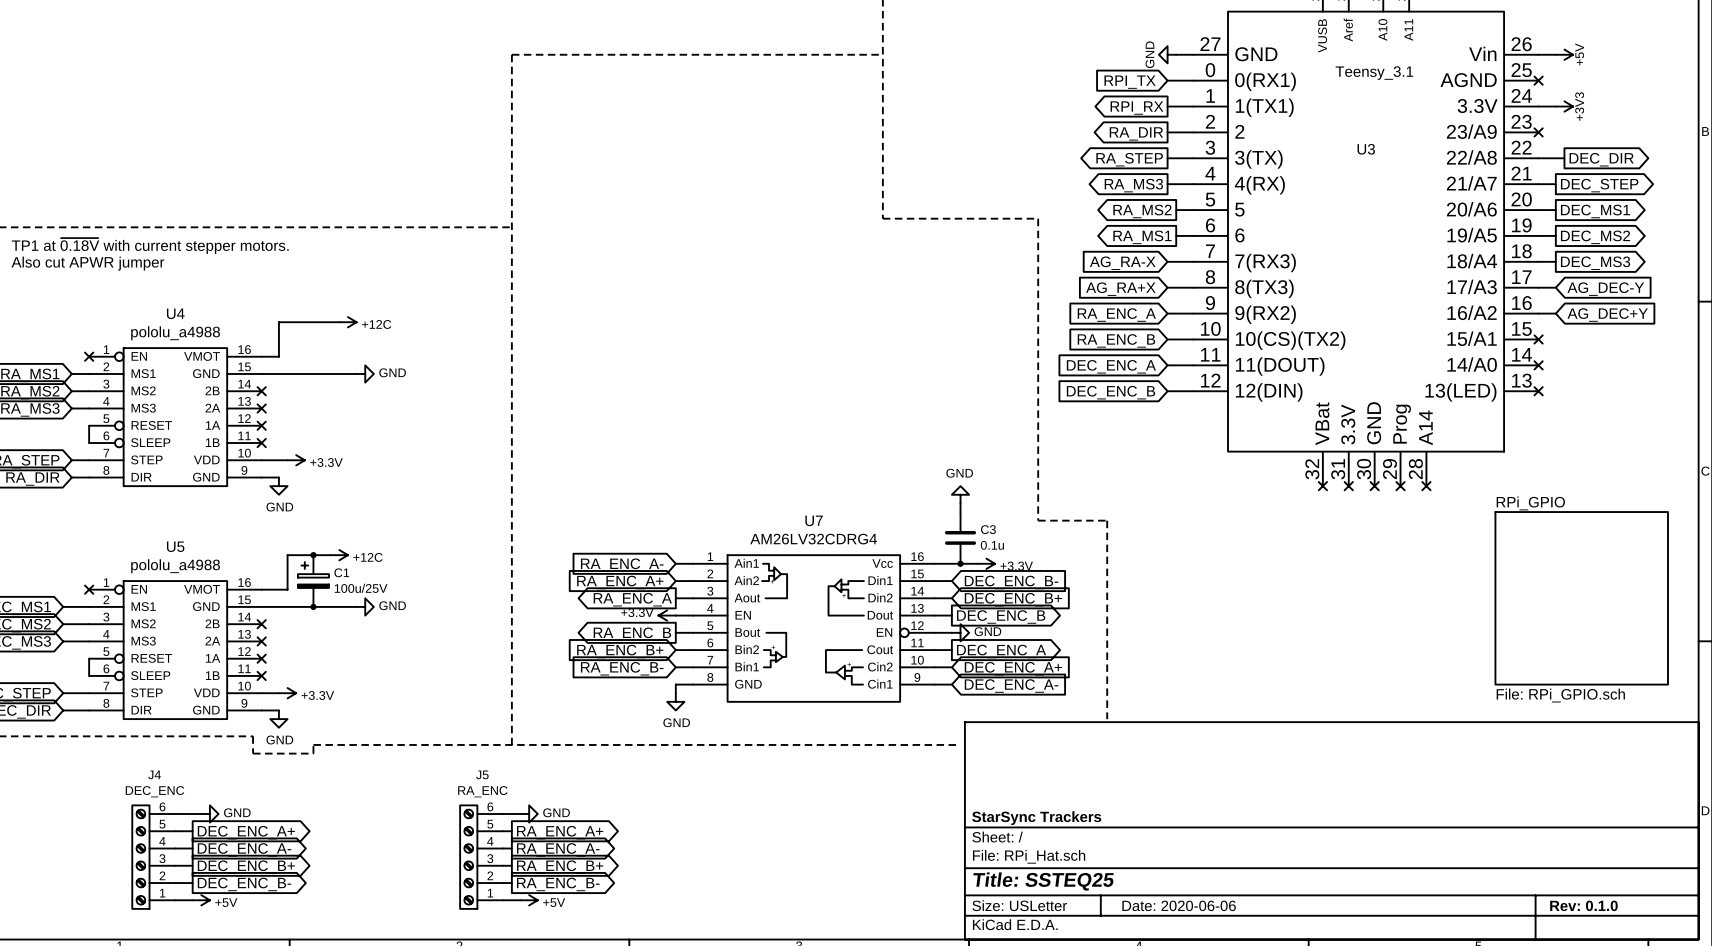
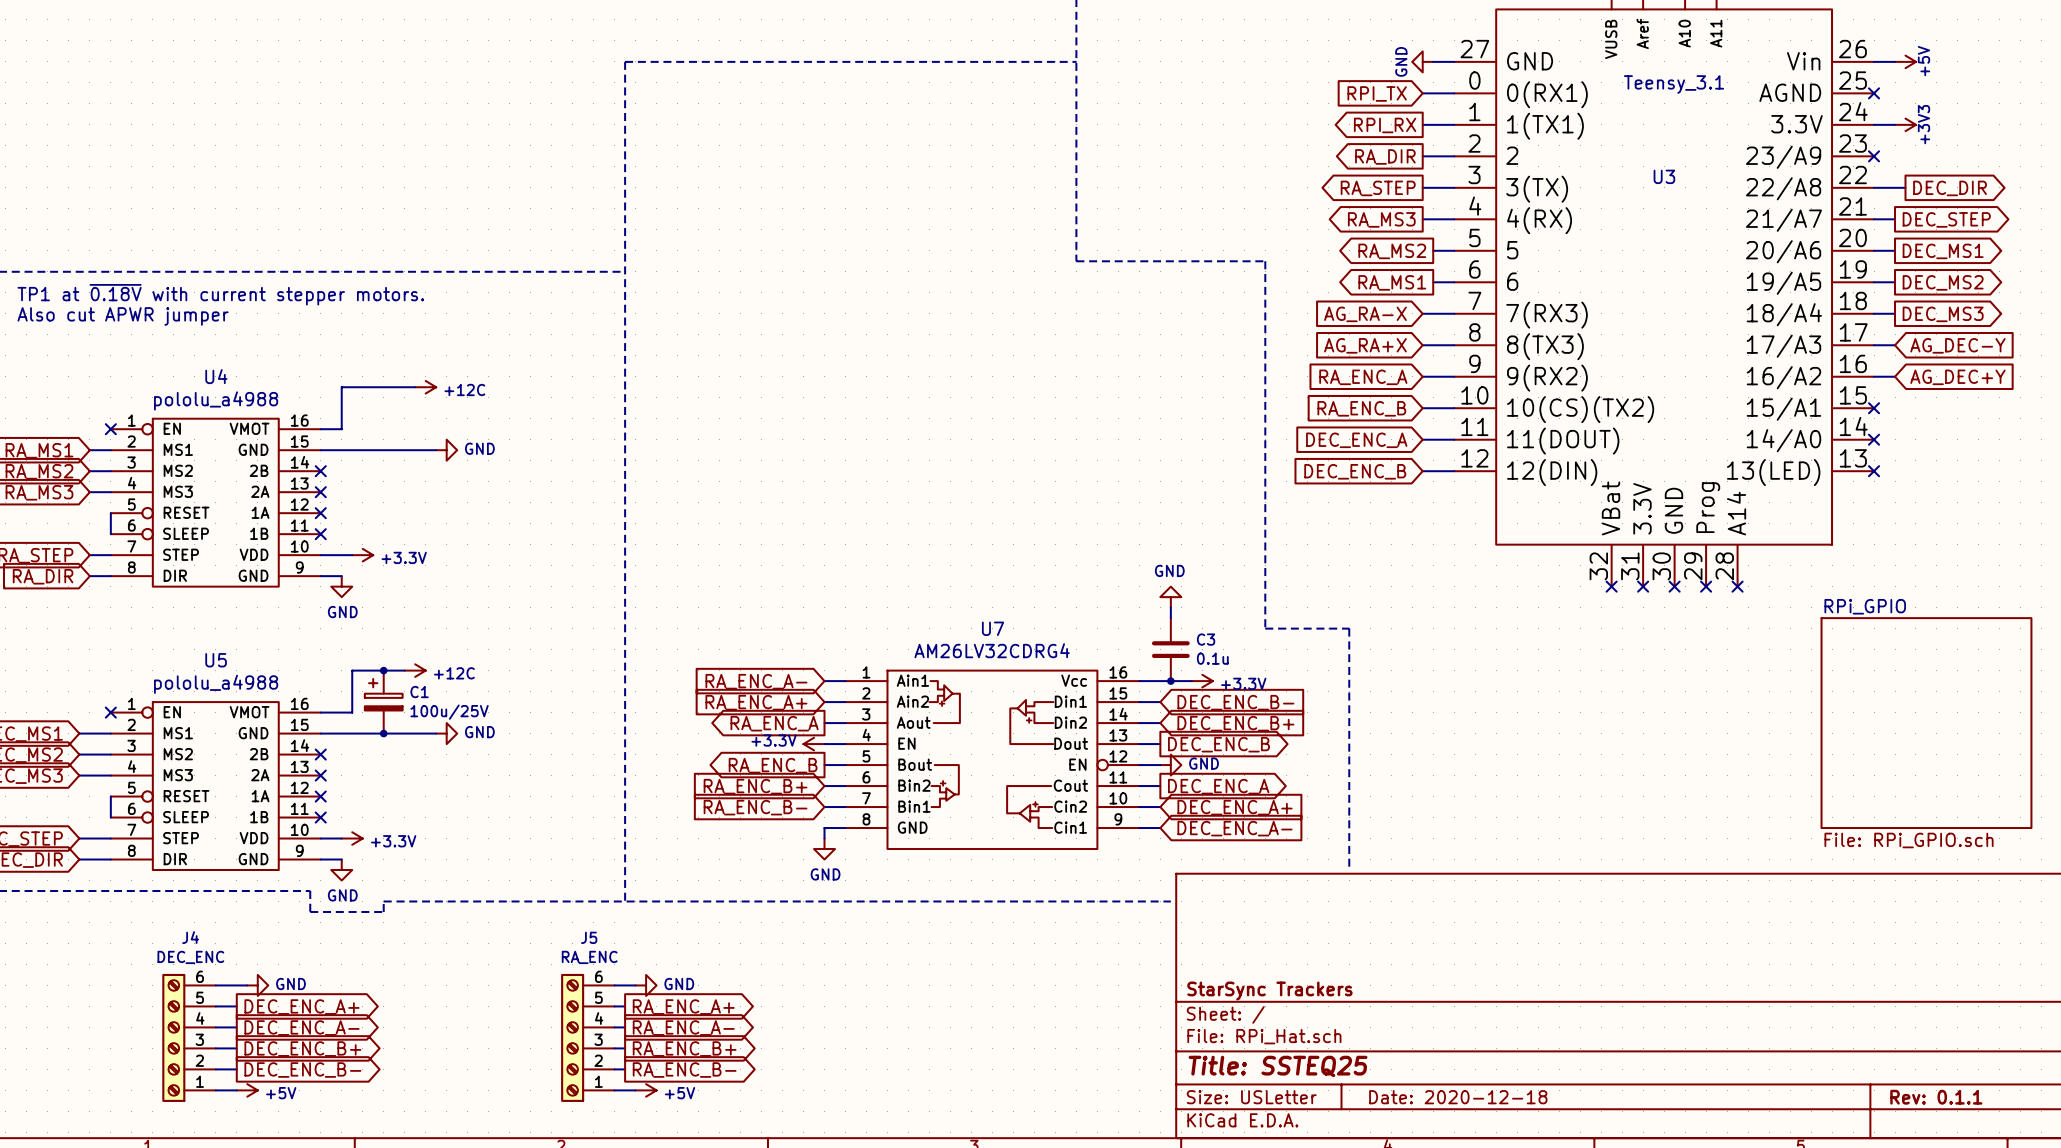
title block: Date: 2020-06-06 (1179, 905) -> Date: 2020-12-18 (1458, 1097)
title block: Rev: 0.1.0 (1583, 905) -> Rev: 0.1.1 (1936, 1097)

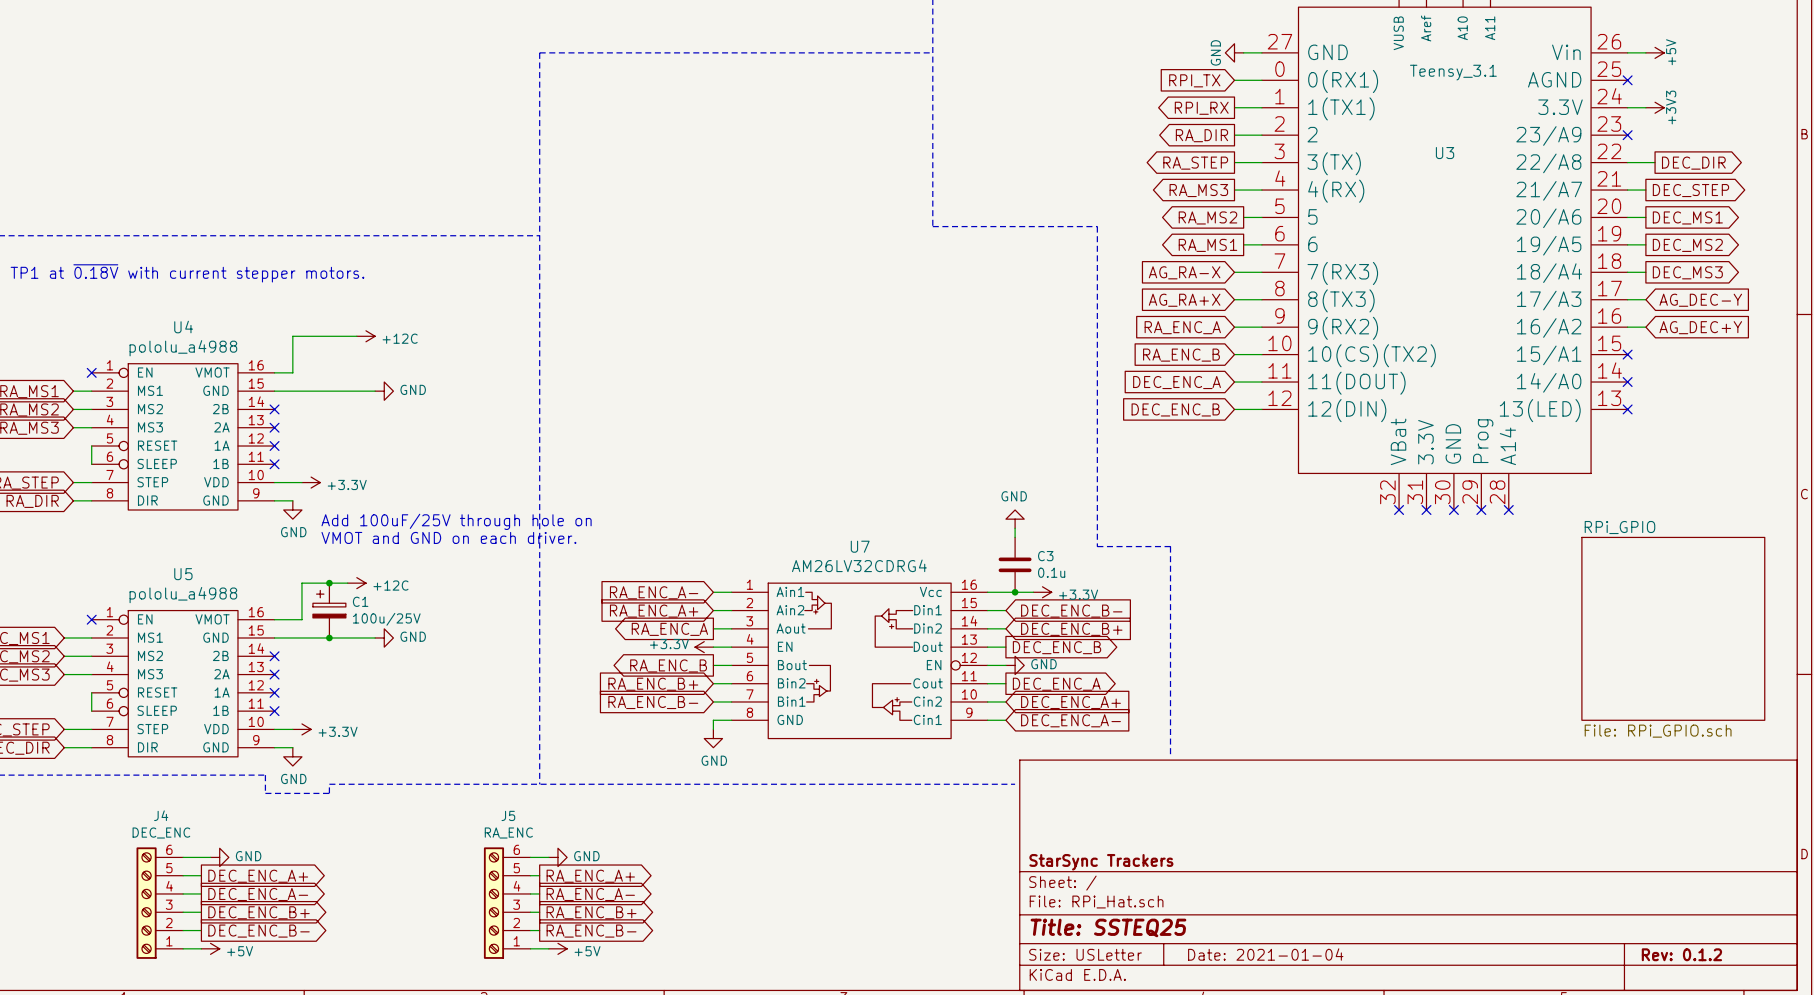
text: TP1 at ~{0.18V} with current stepper motors. (220, 294) -> none
text: Also cut APWR jumper (123, 316) -> TP1 at ~{0.18V} with current stepper motors. (187, 273)
text: none -> Add 100uF/25V through hole on (456, 521)
text: none -> VMOT and GND on each driver. (448, 537)
title block: Date: 2020-12-18 (1458, 1097) -> Date: 2021-01-04 (1265, 954)
title block: Rev: 0.1.1 (1936, 1097) -> Rev: 0.1.2 (1681, 954)

